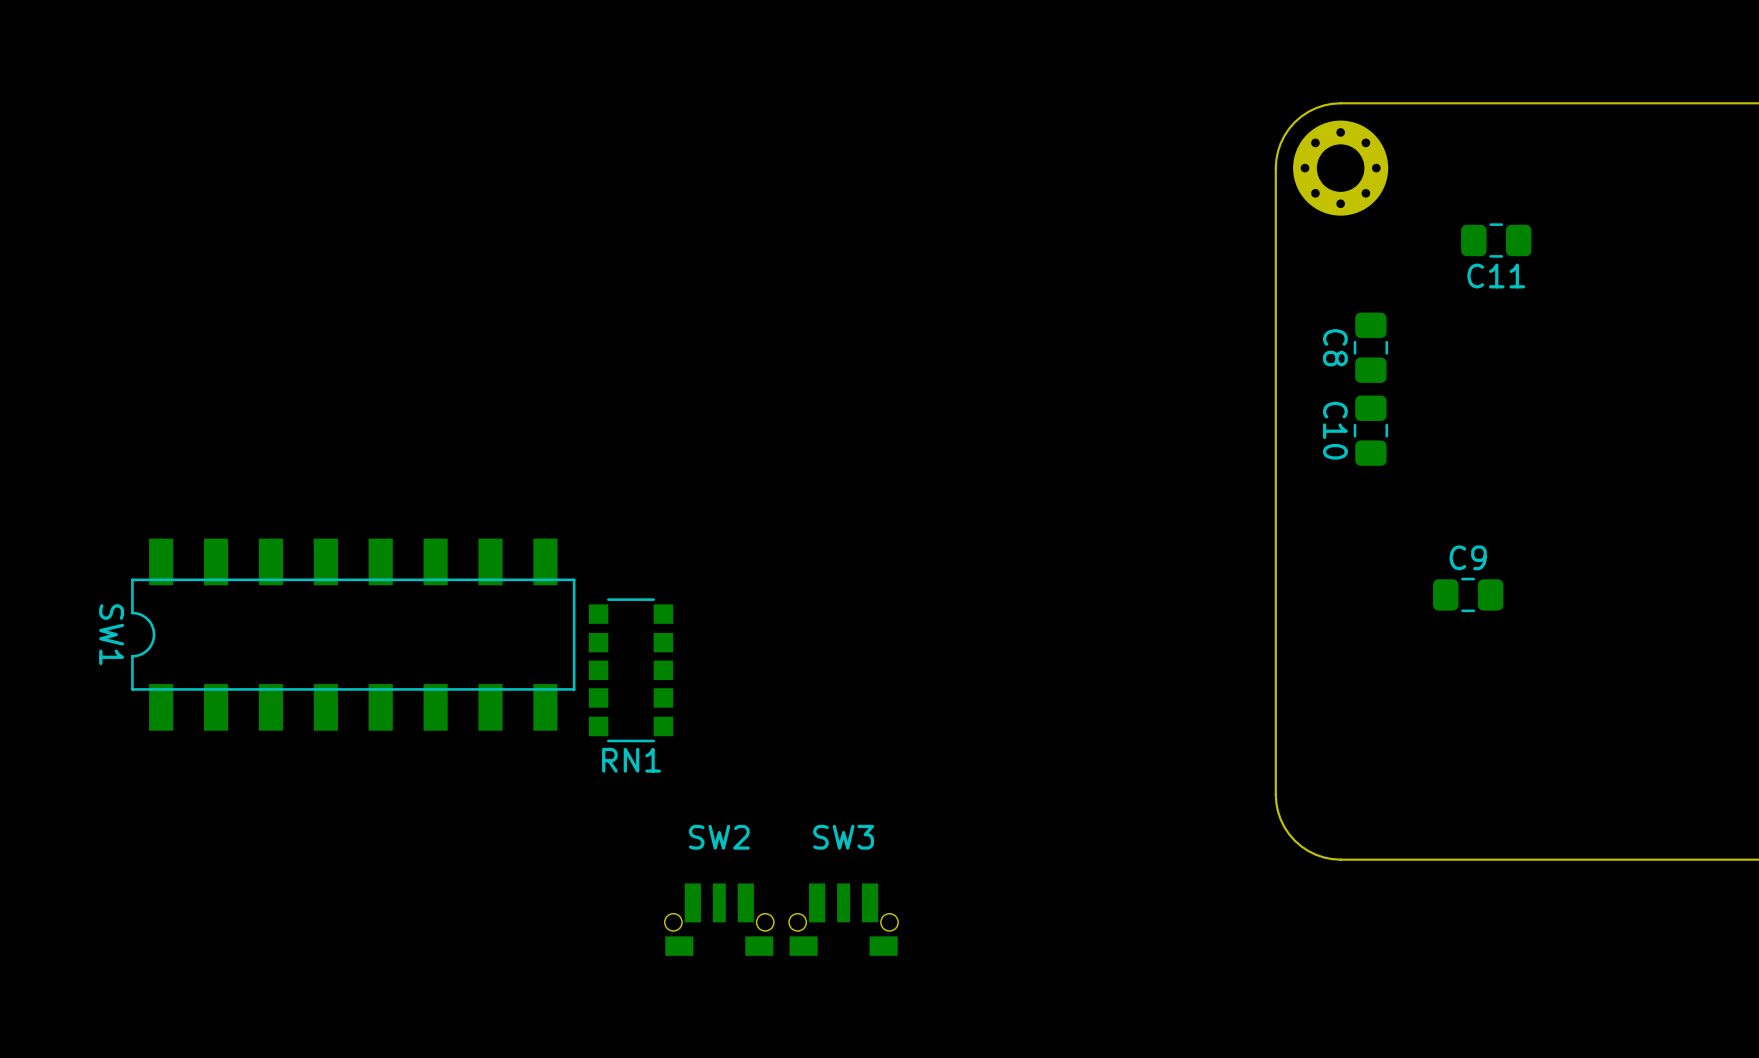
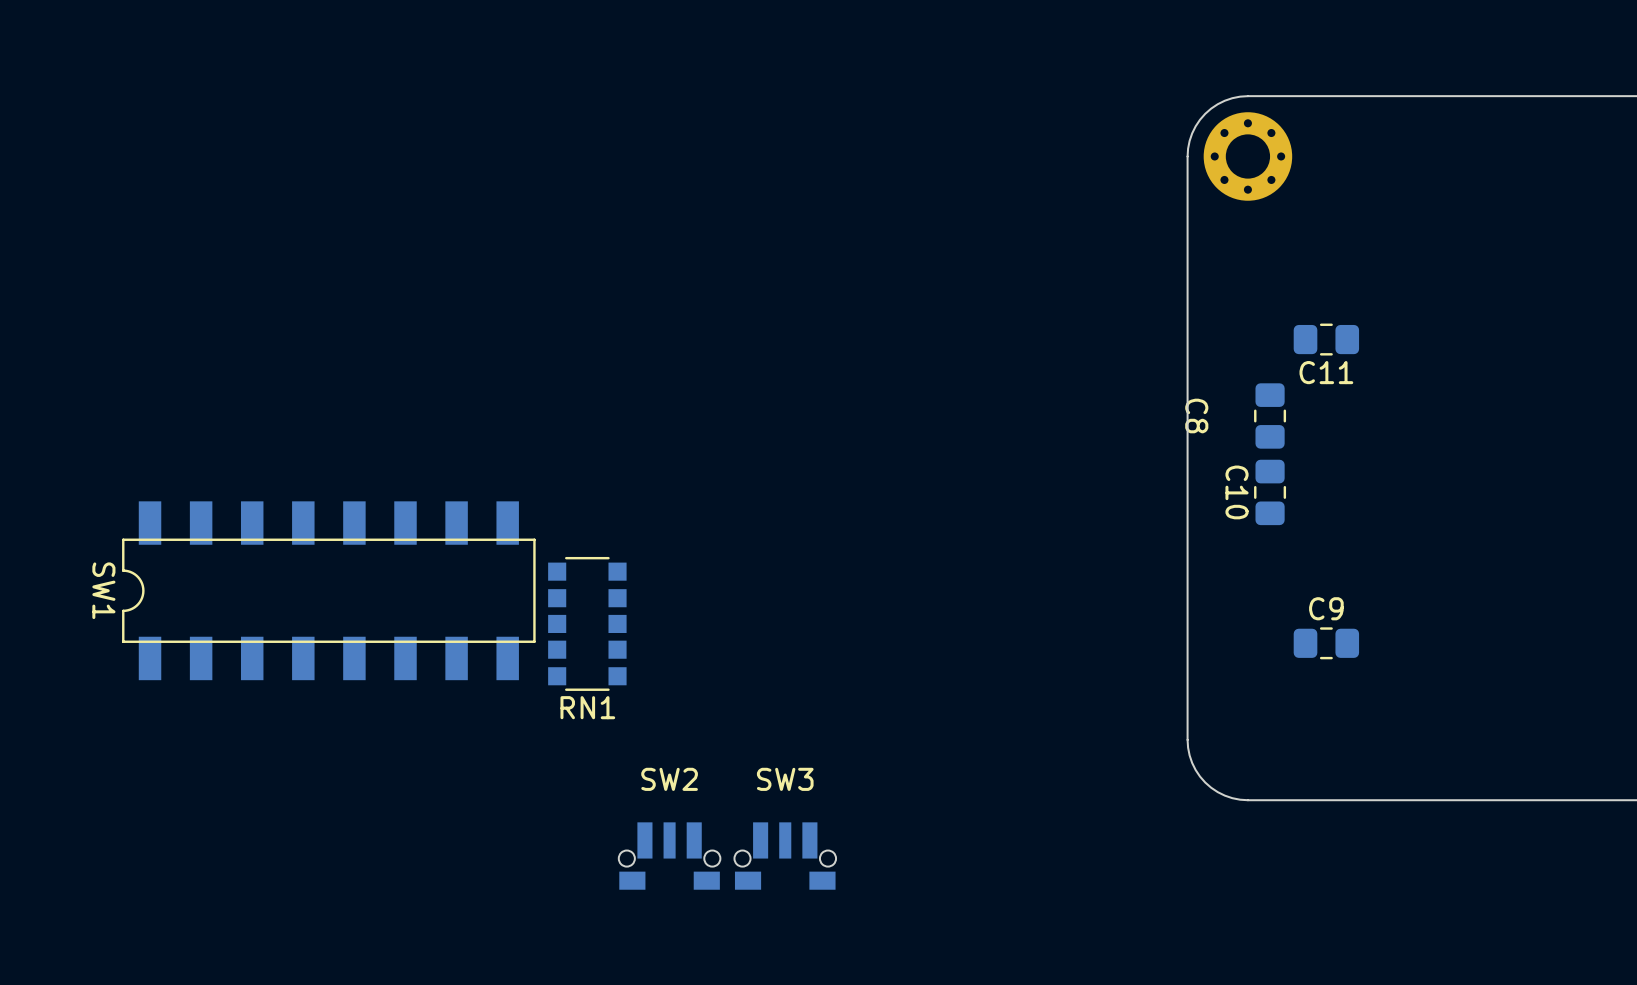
C11 position: (1496, 240) -> (1326, 339)
C8 name position: C8 (1335, 347) -> C8 (1196, 415)
C8 position: (1370, 347) -> (1270, 415)
C10 position: (1370, 430) -> (1270, 492)
C9 position: (1468, 594) -> (1326, 643)

